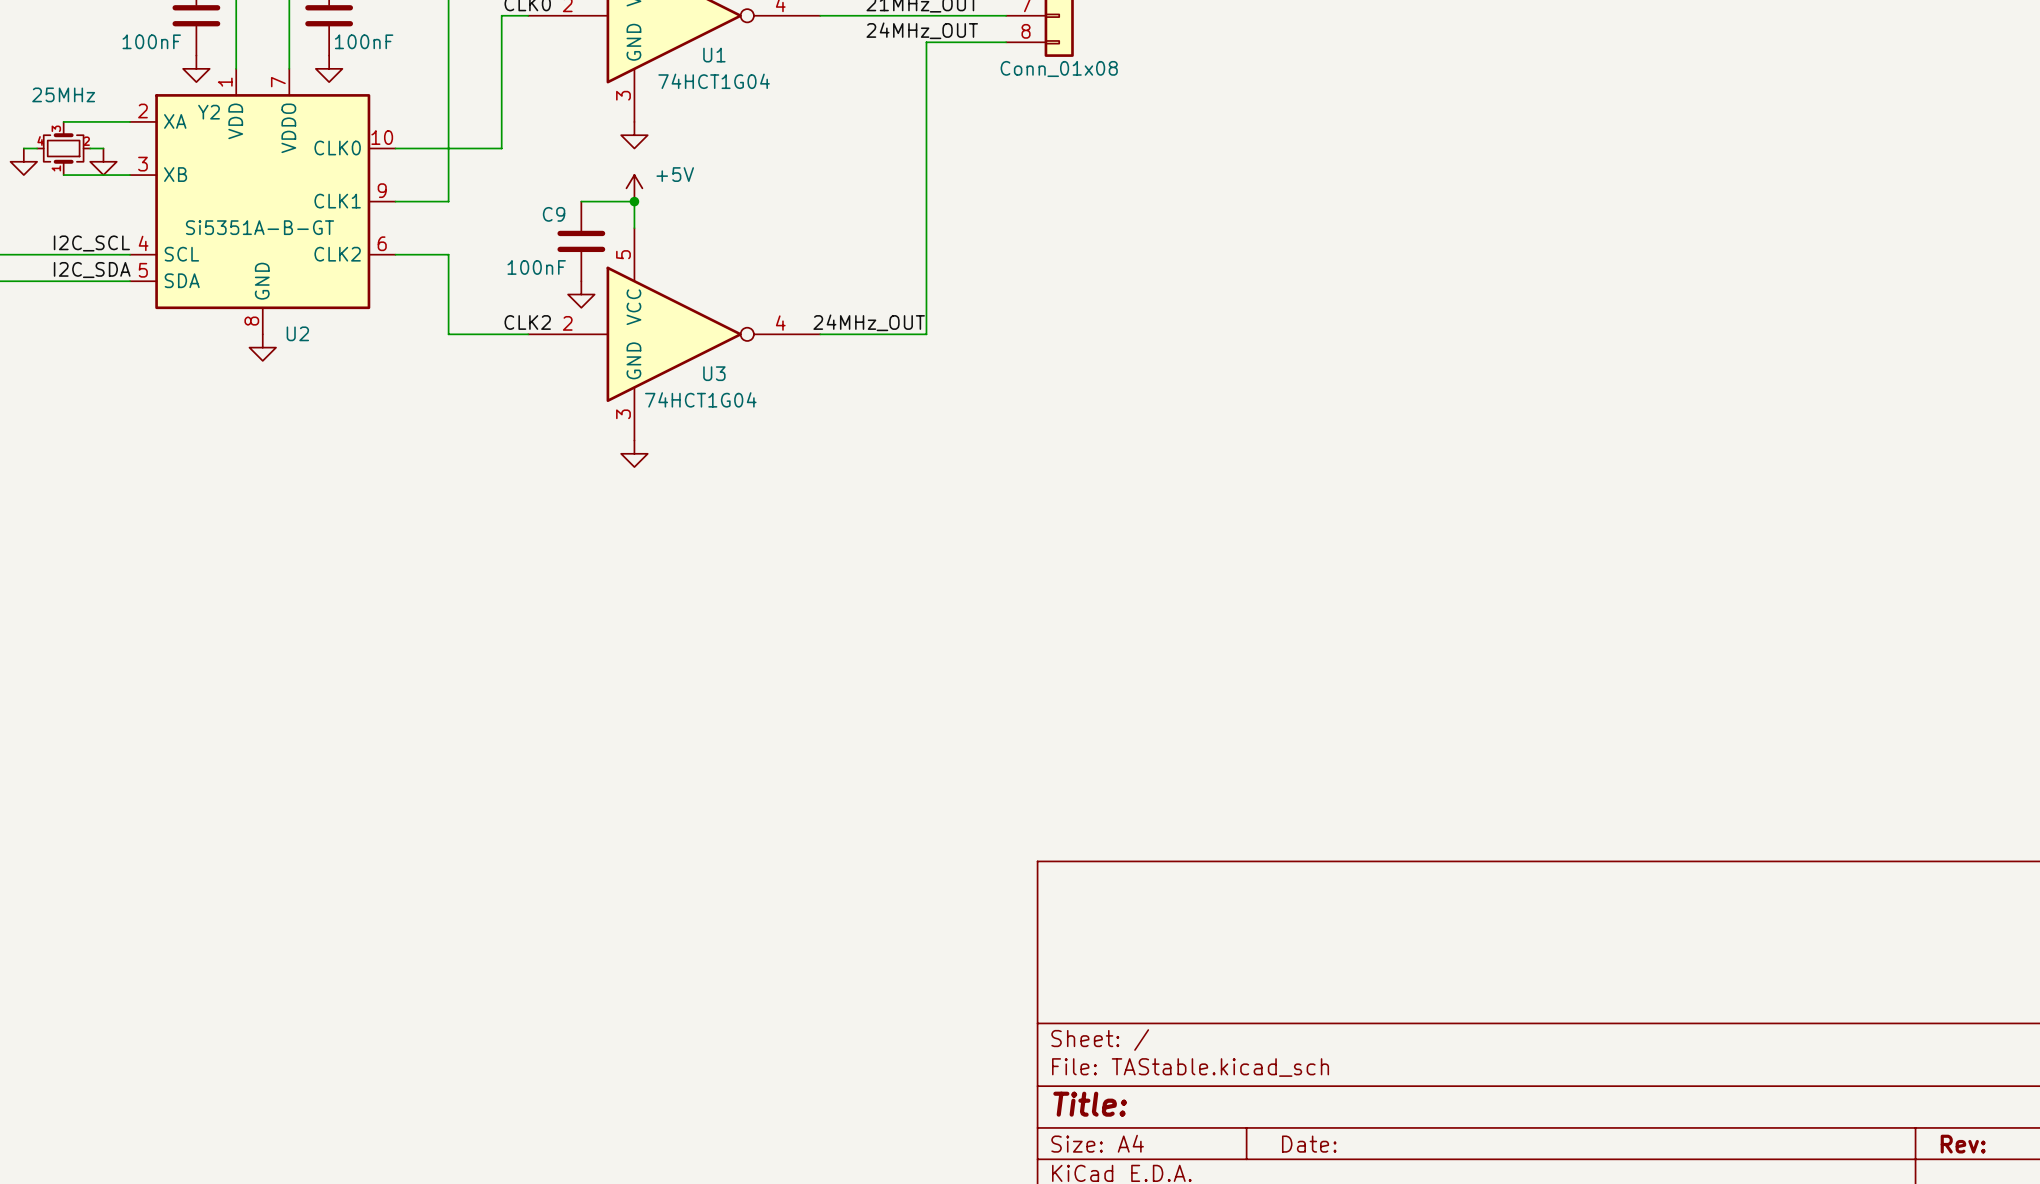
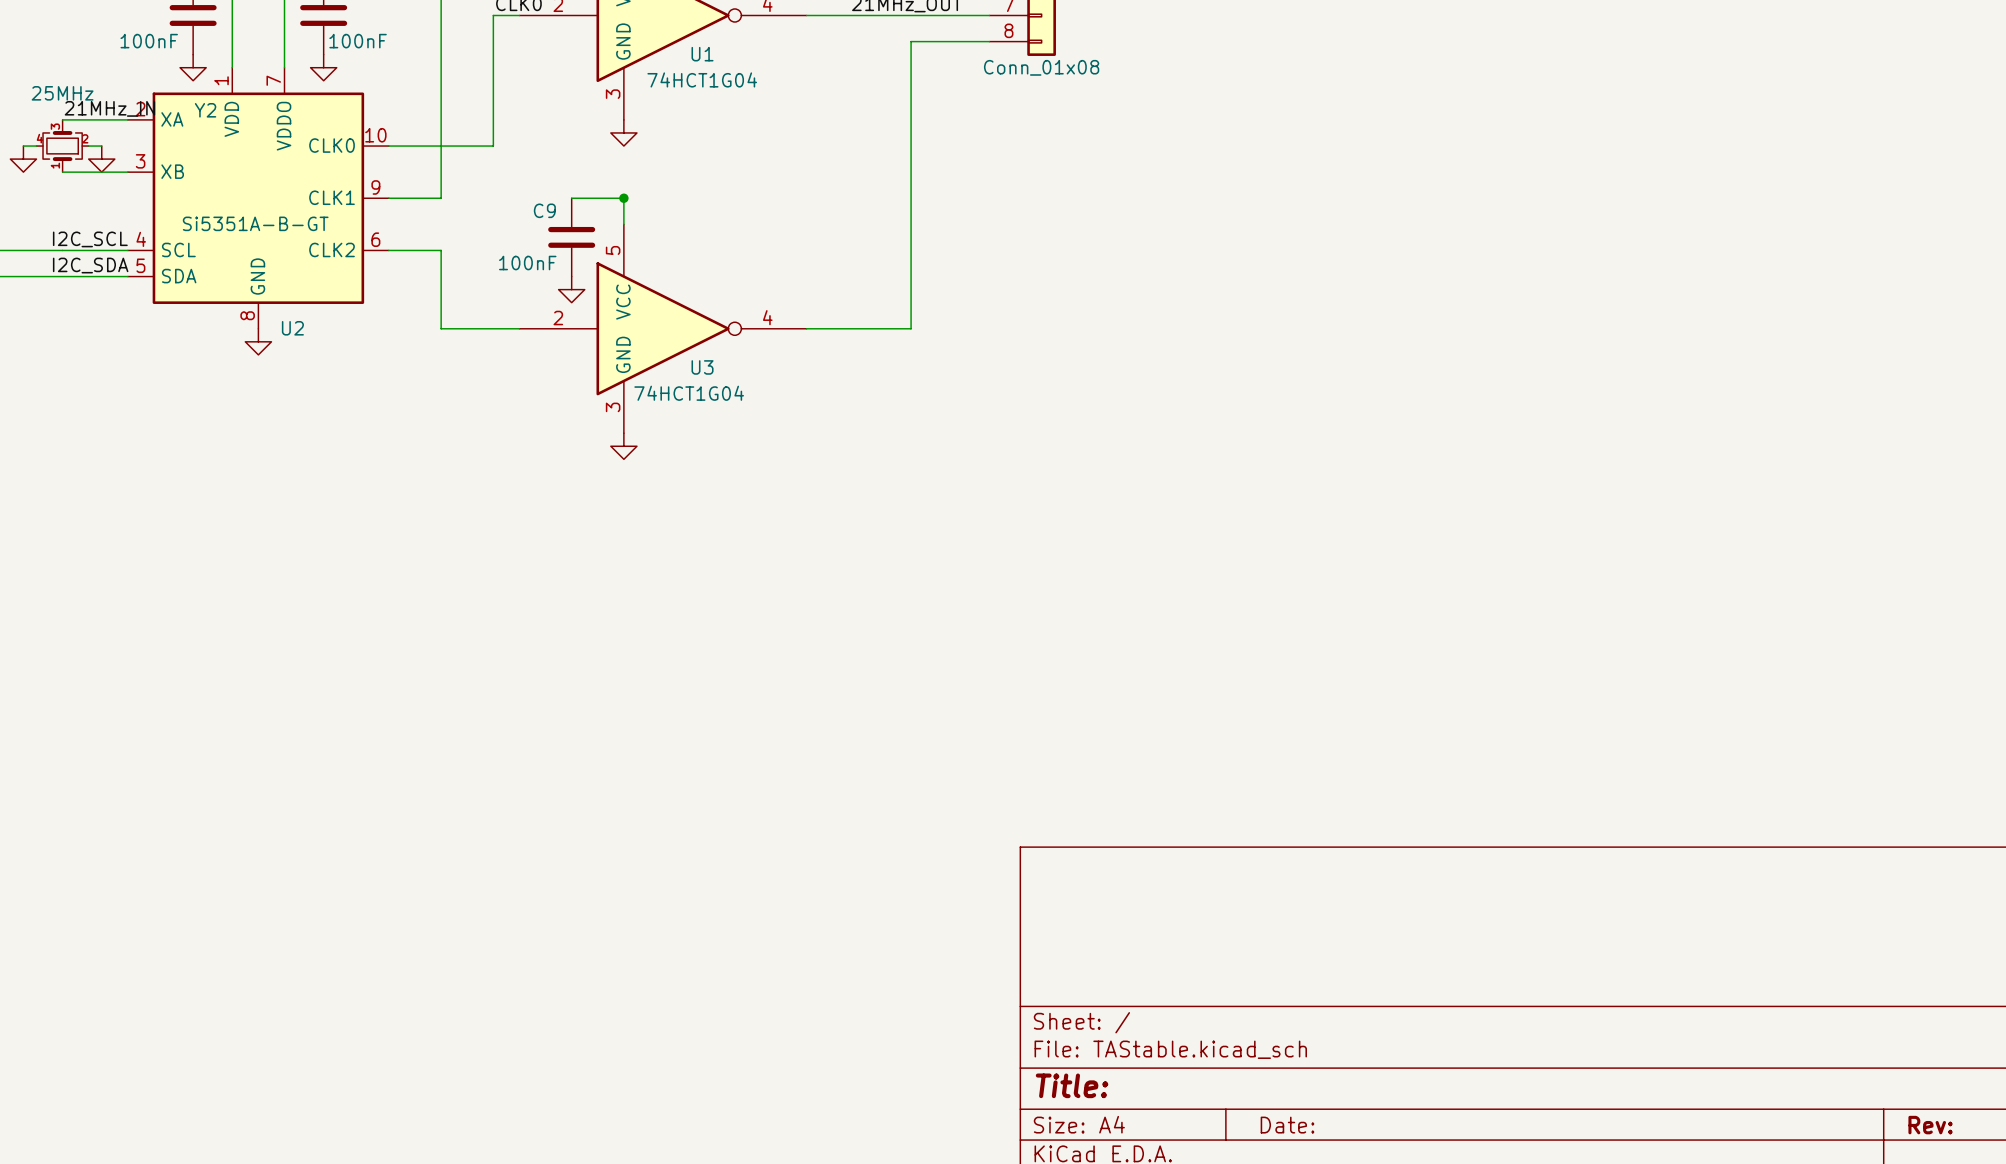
label: 24MHz_OUT (922, 30) -> none
label: none -> 21MHz_IN (109, 108)
power symbol: +5V (634, 188) -> none
label: CLK2 (527, 322) -> none
label: 24MHz_OUT (869, 322) -> none

